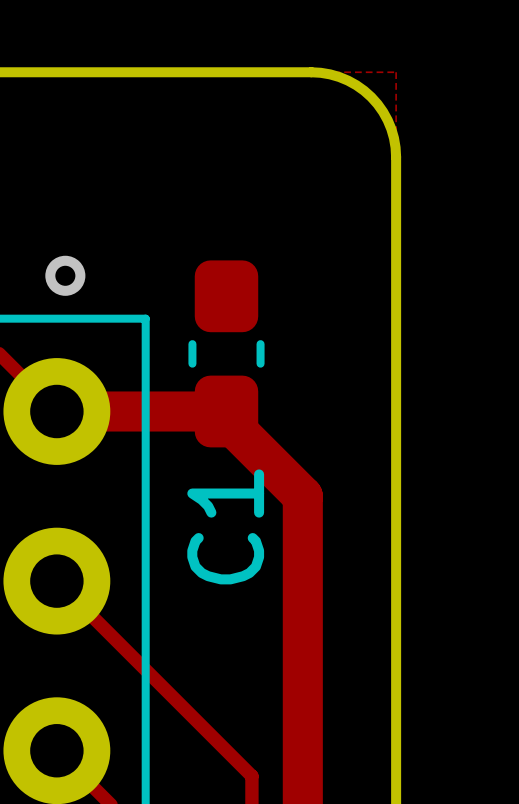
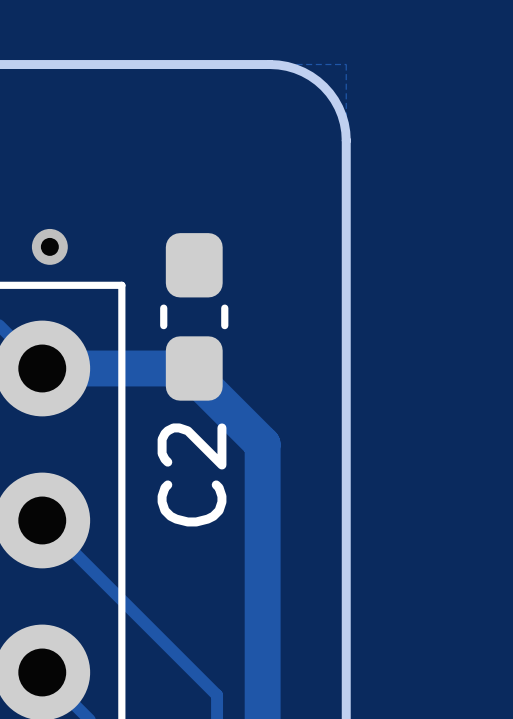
C1 name: C1 (225, 526) -> C2 (192, 474)

